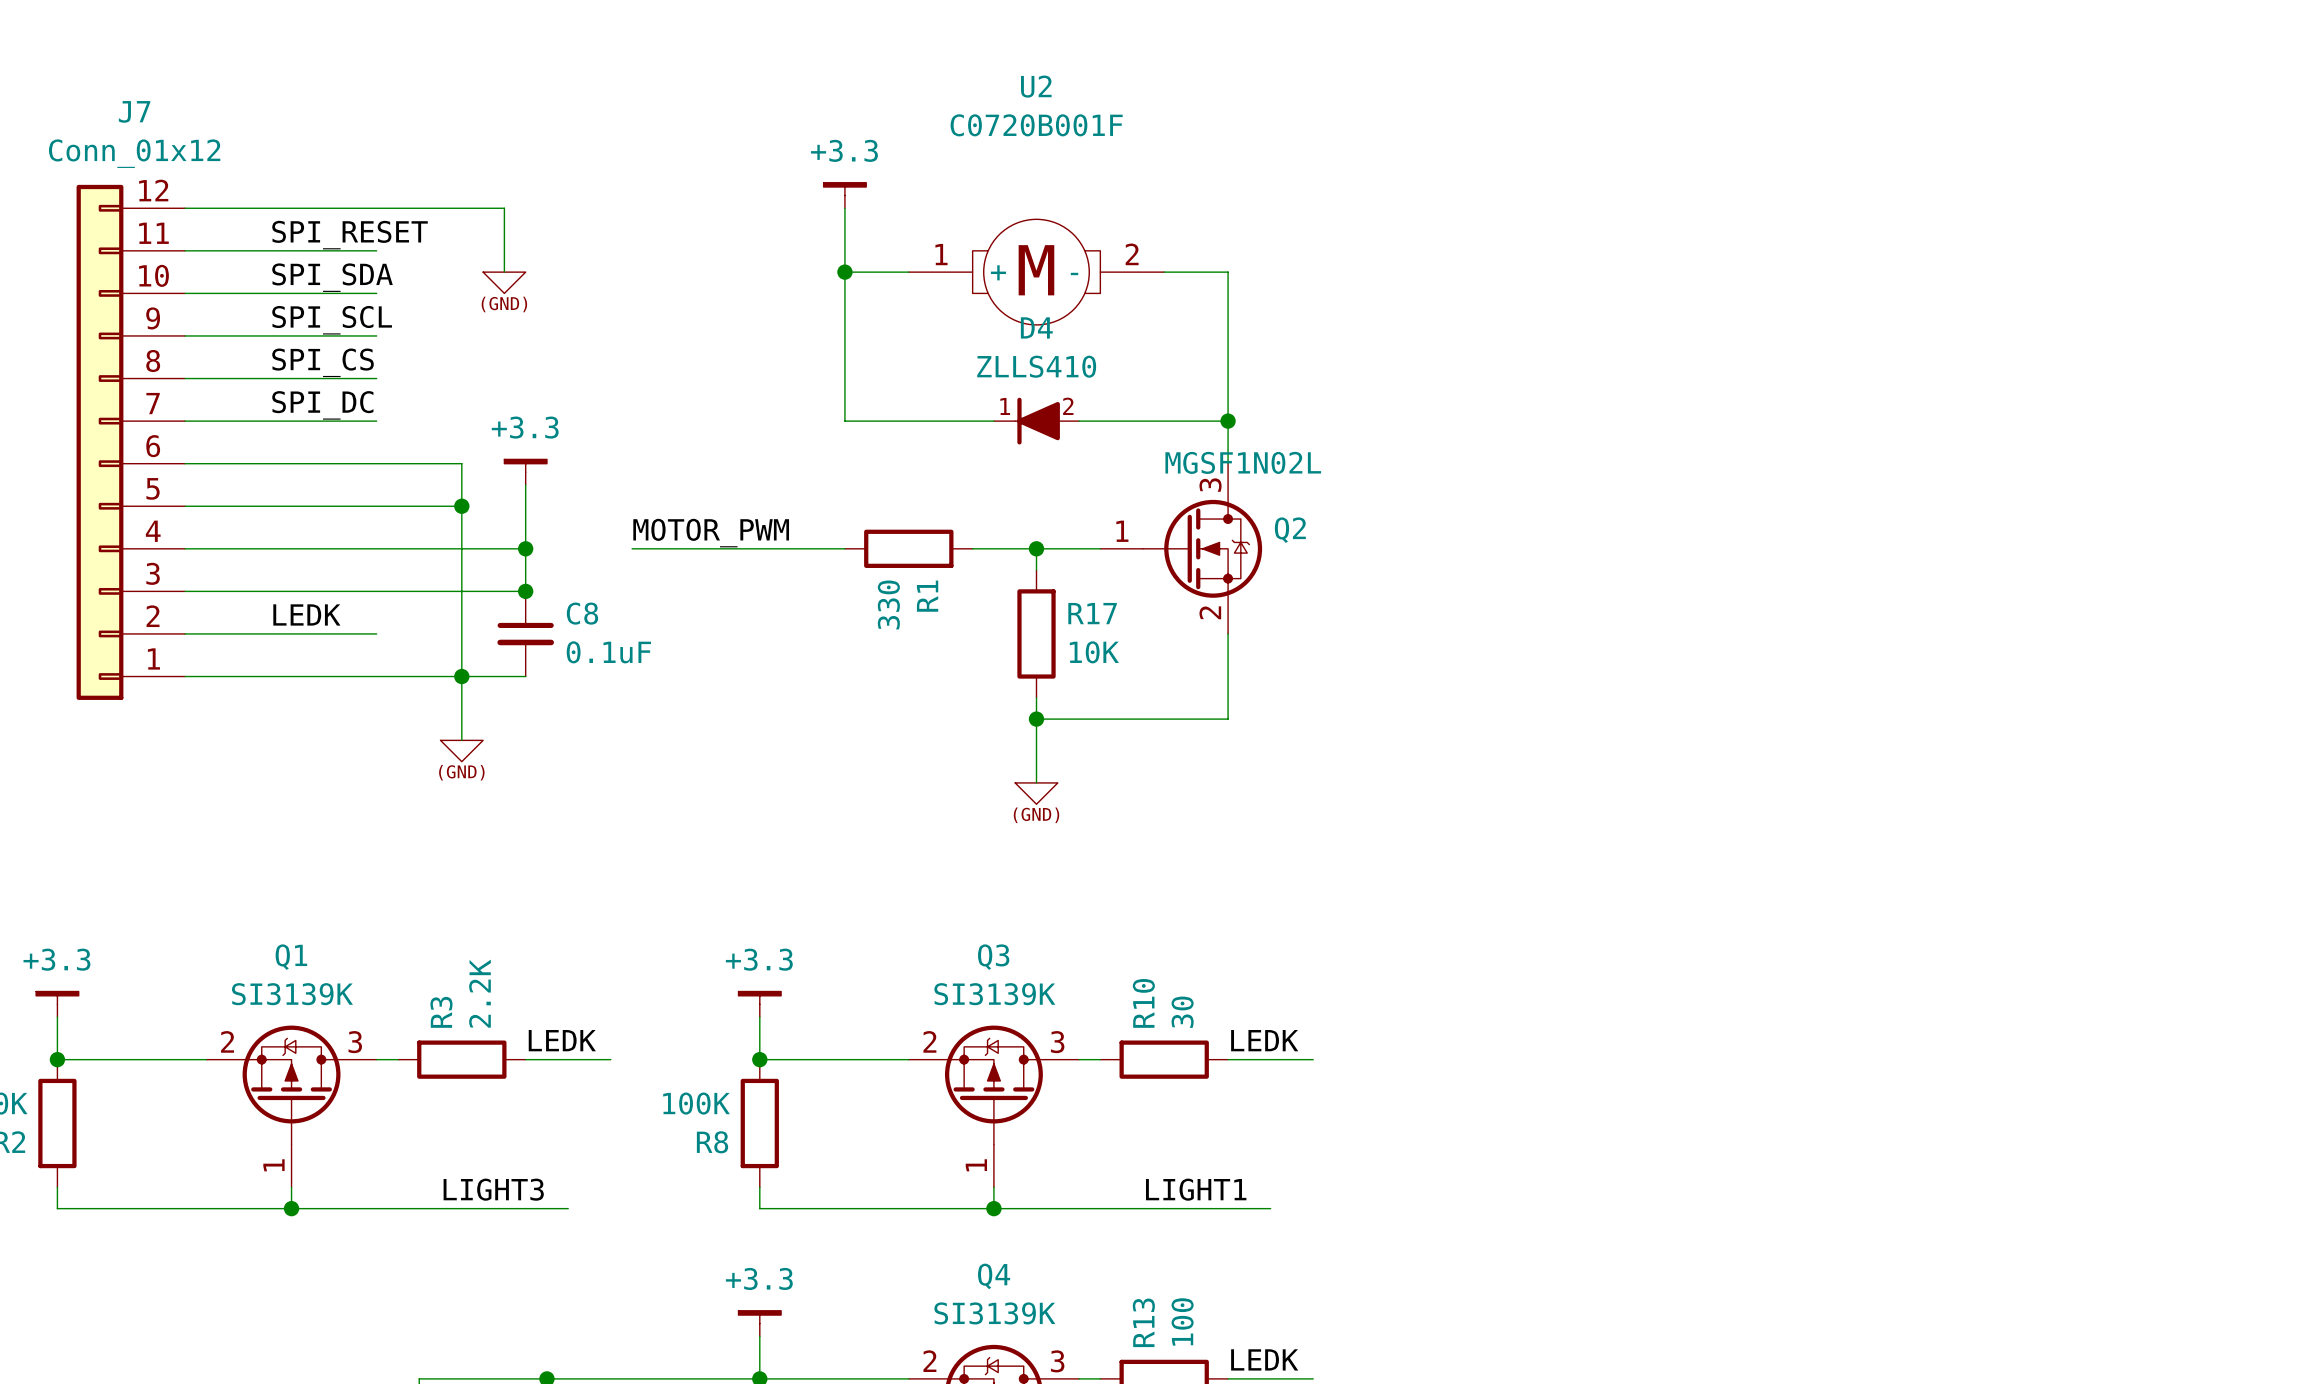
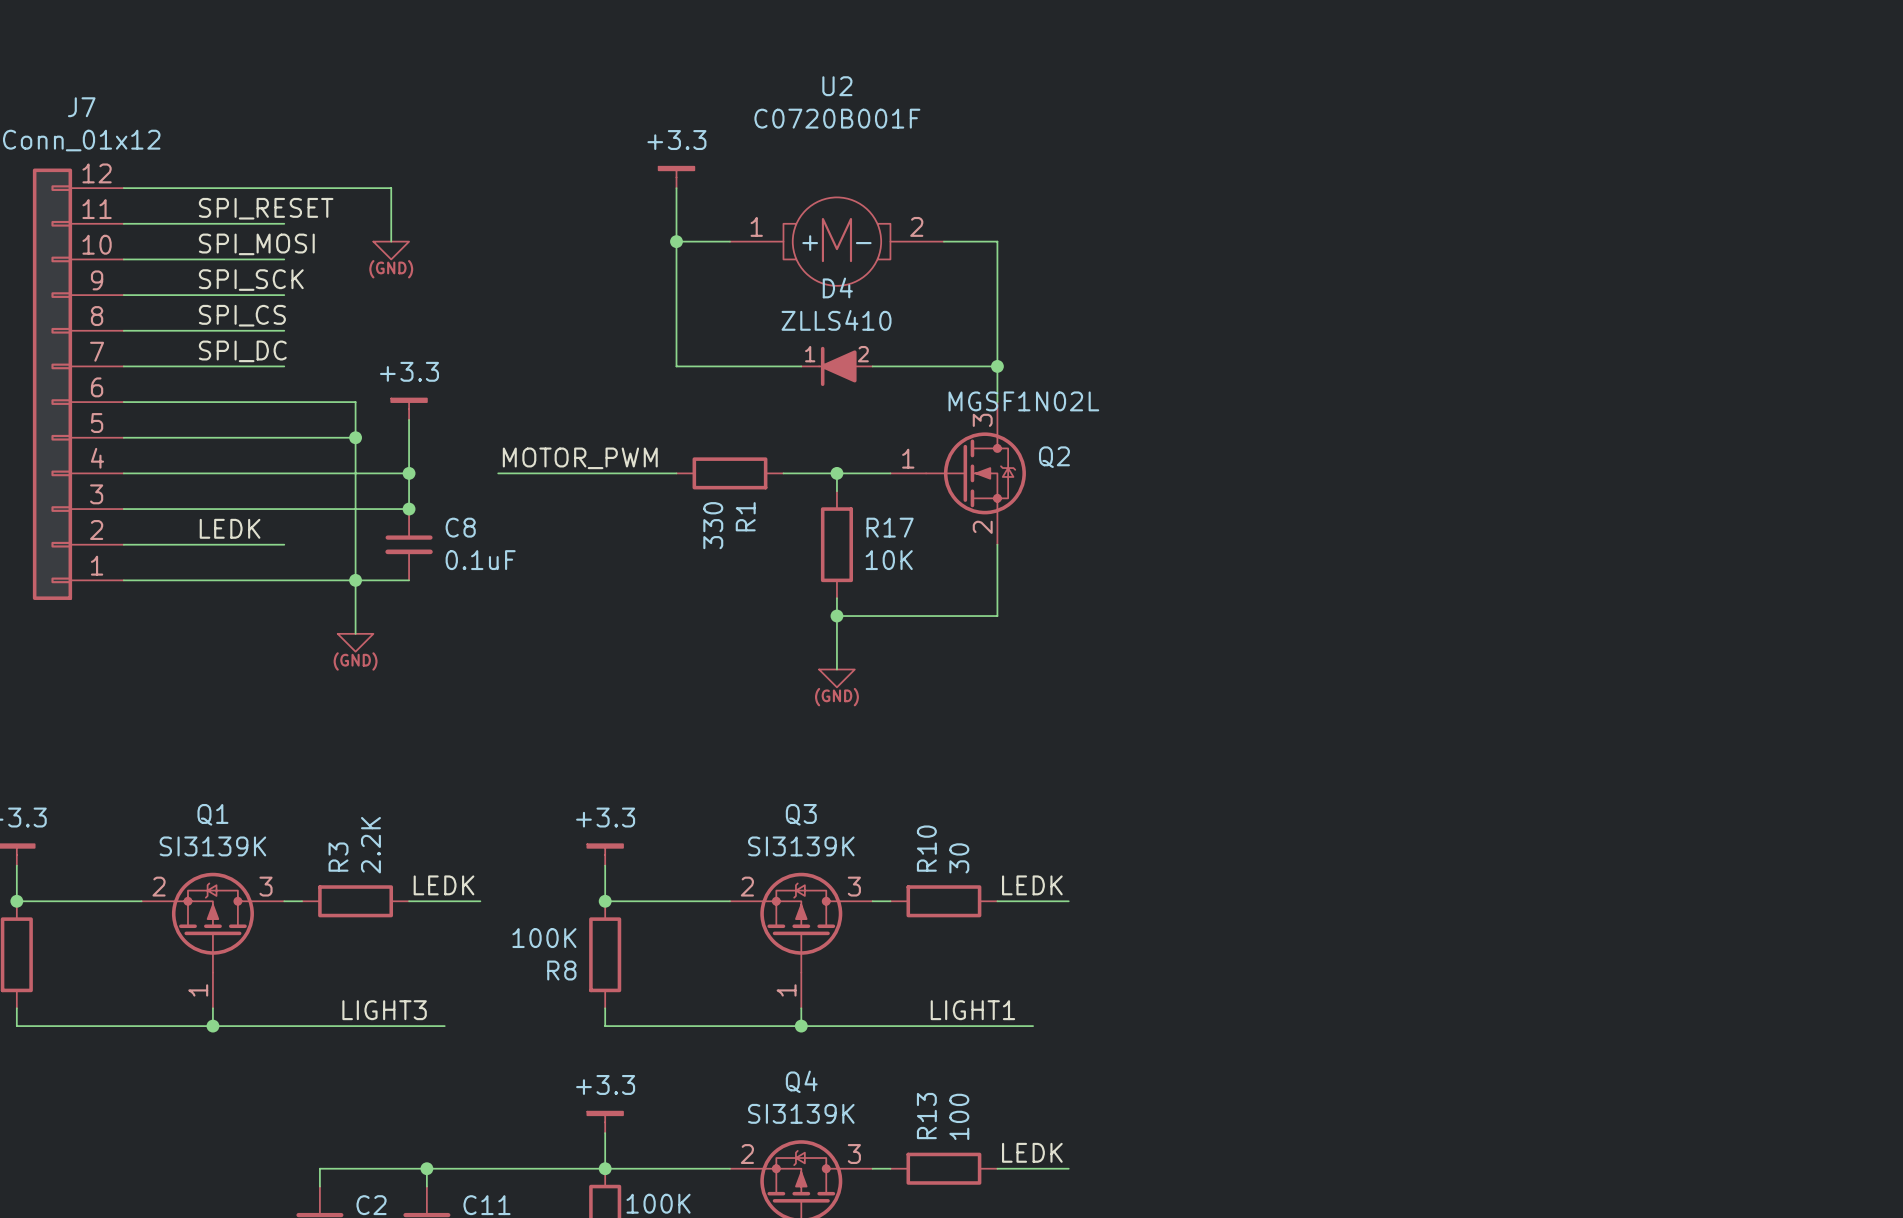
label: SPI_SDA (332, 277) -> SPI_MOSI (256, 244)
label: SPI_SCL (332, 320) -> SPI_SCK (251, 280)

